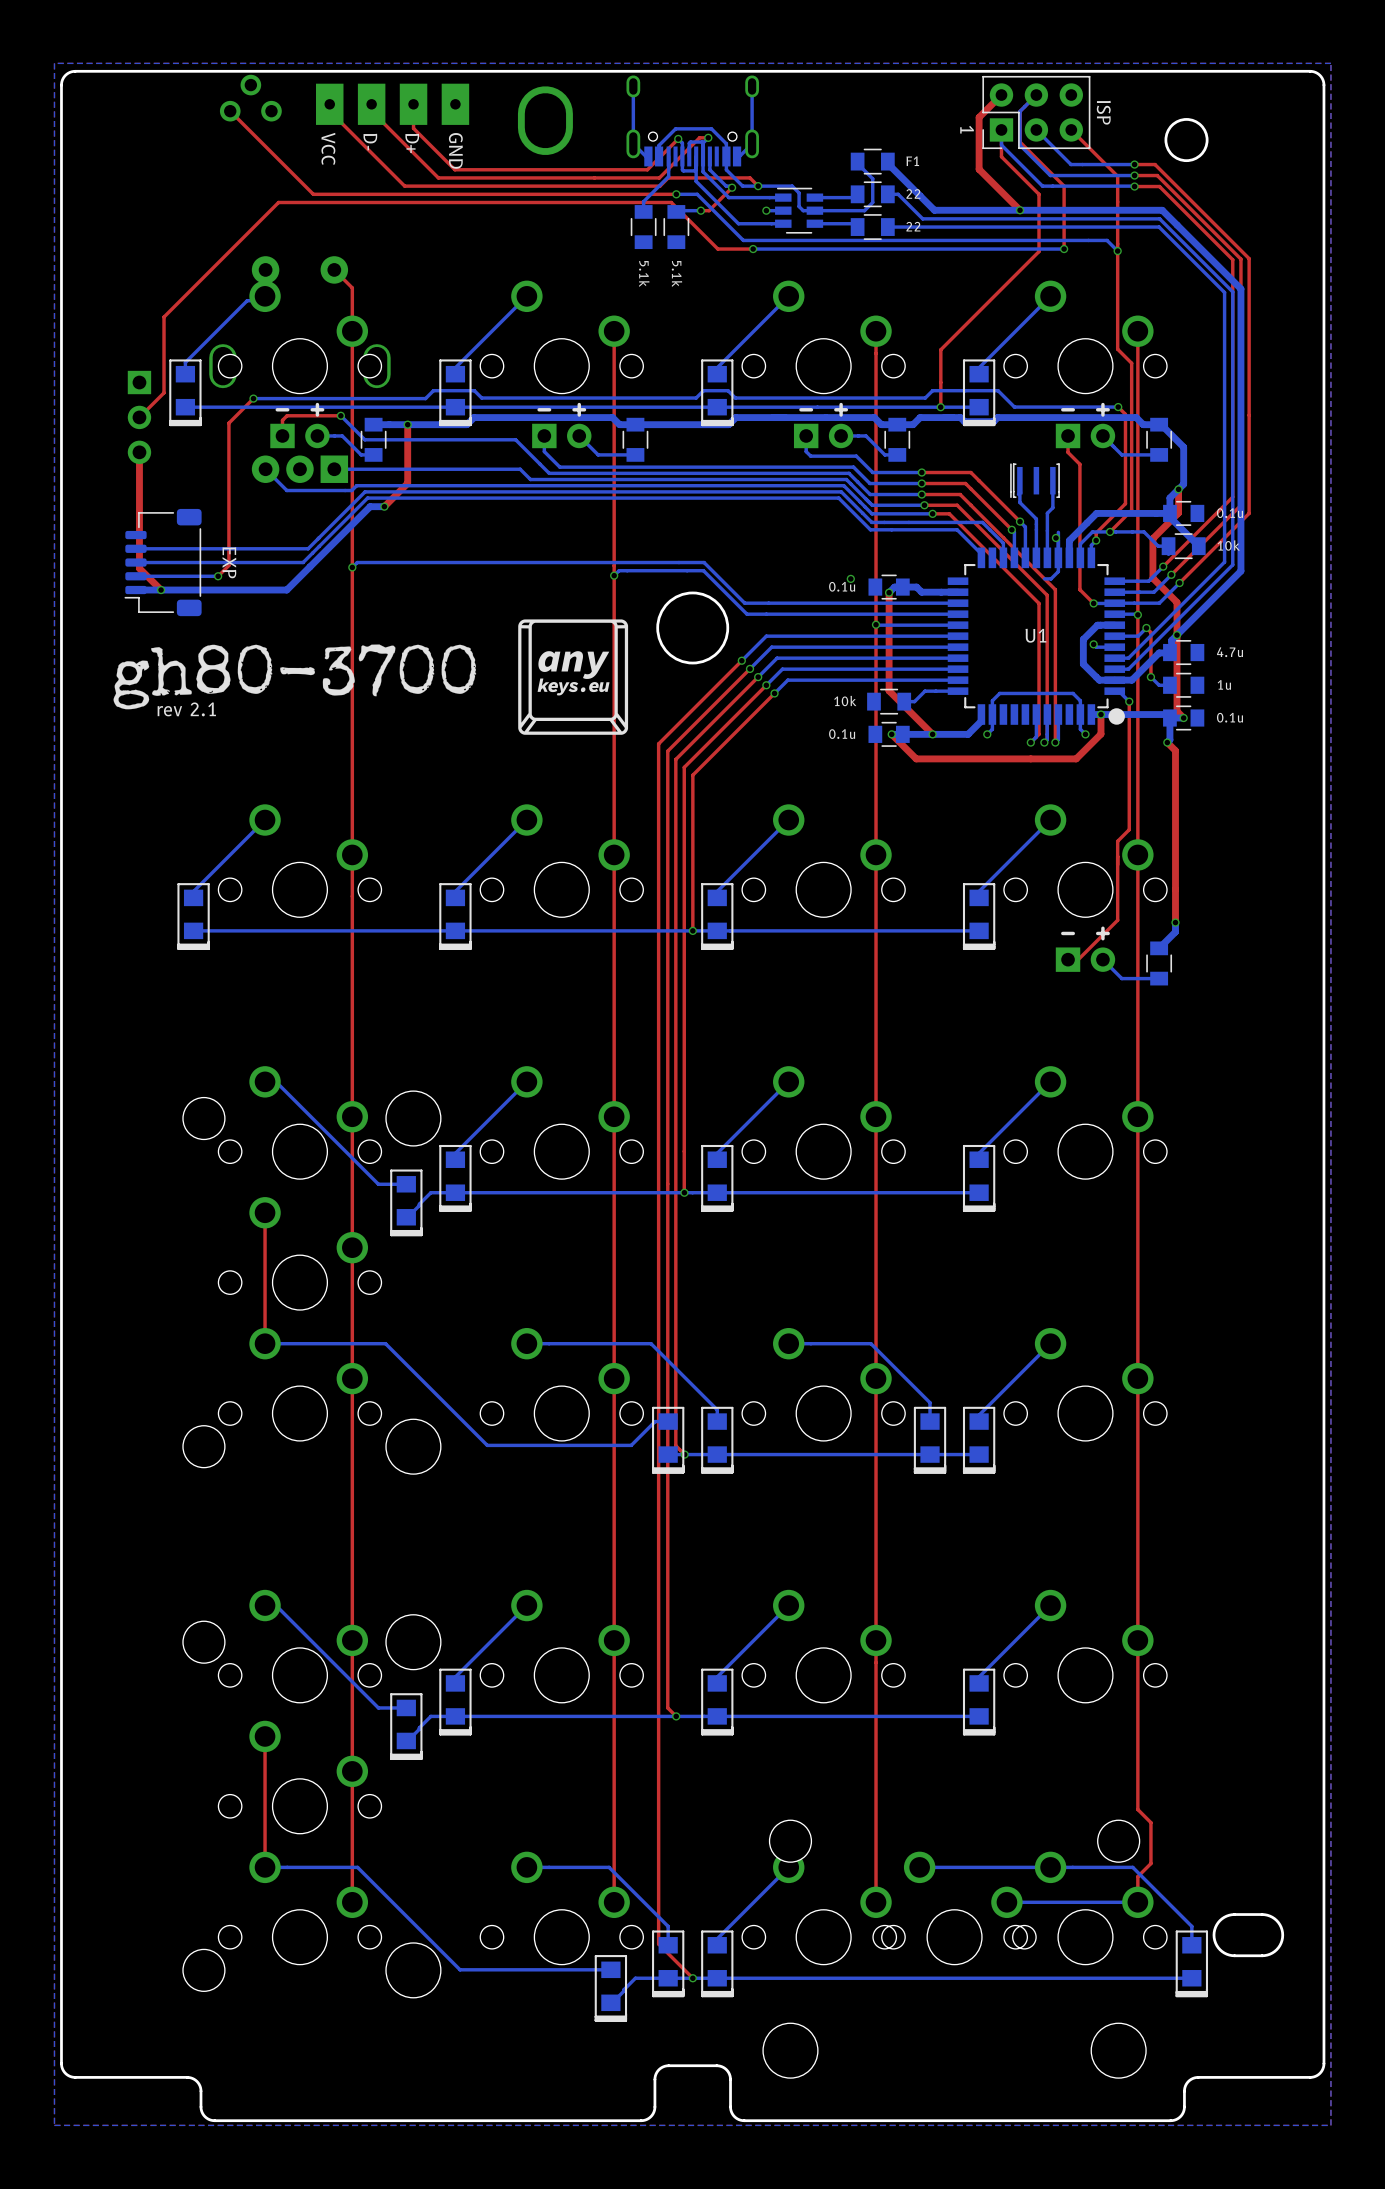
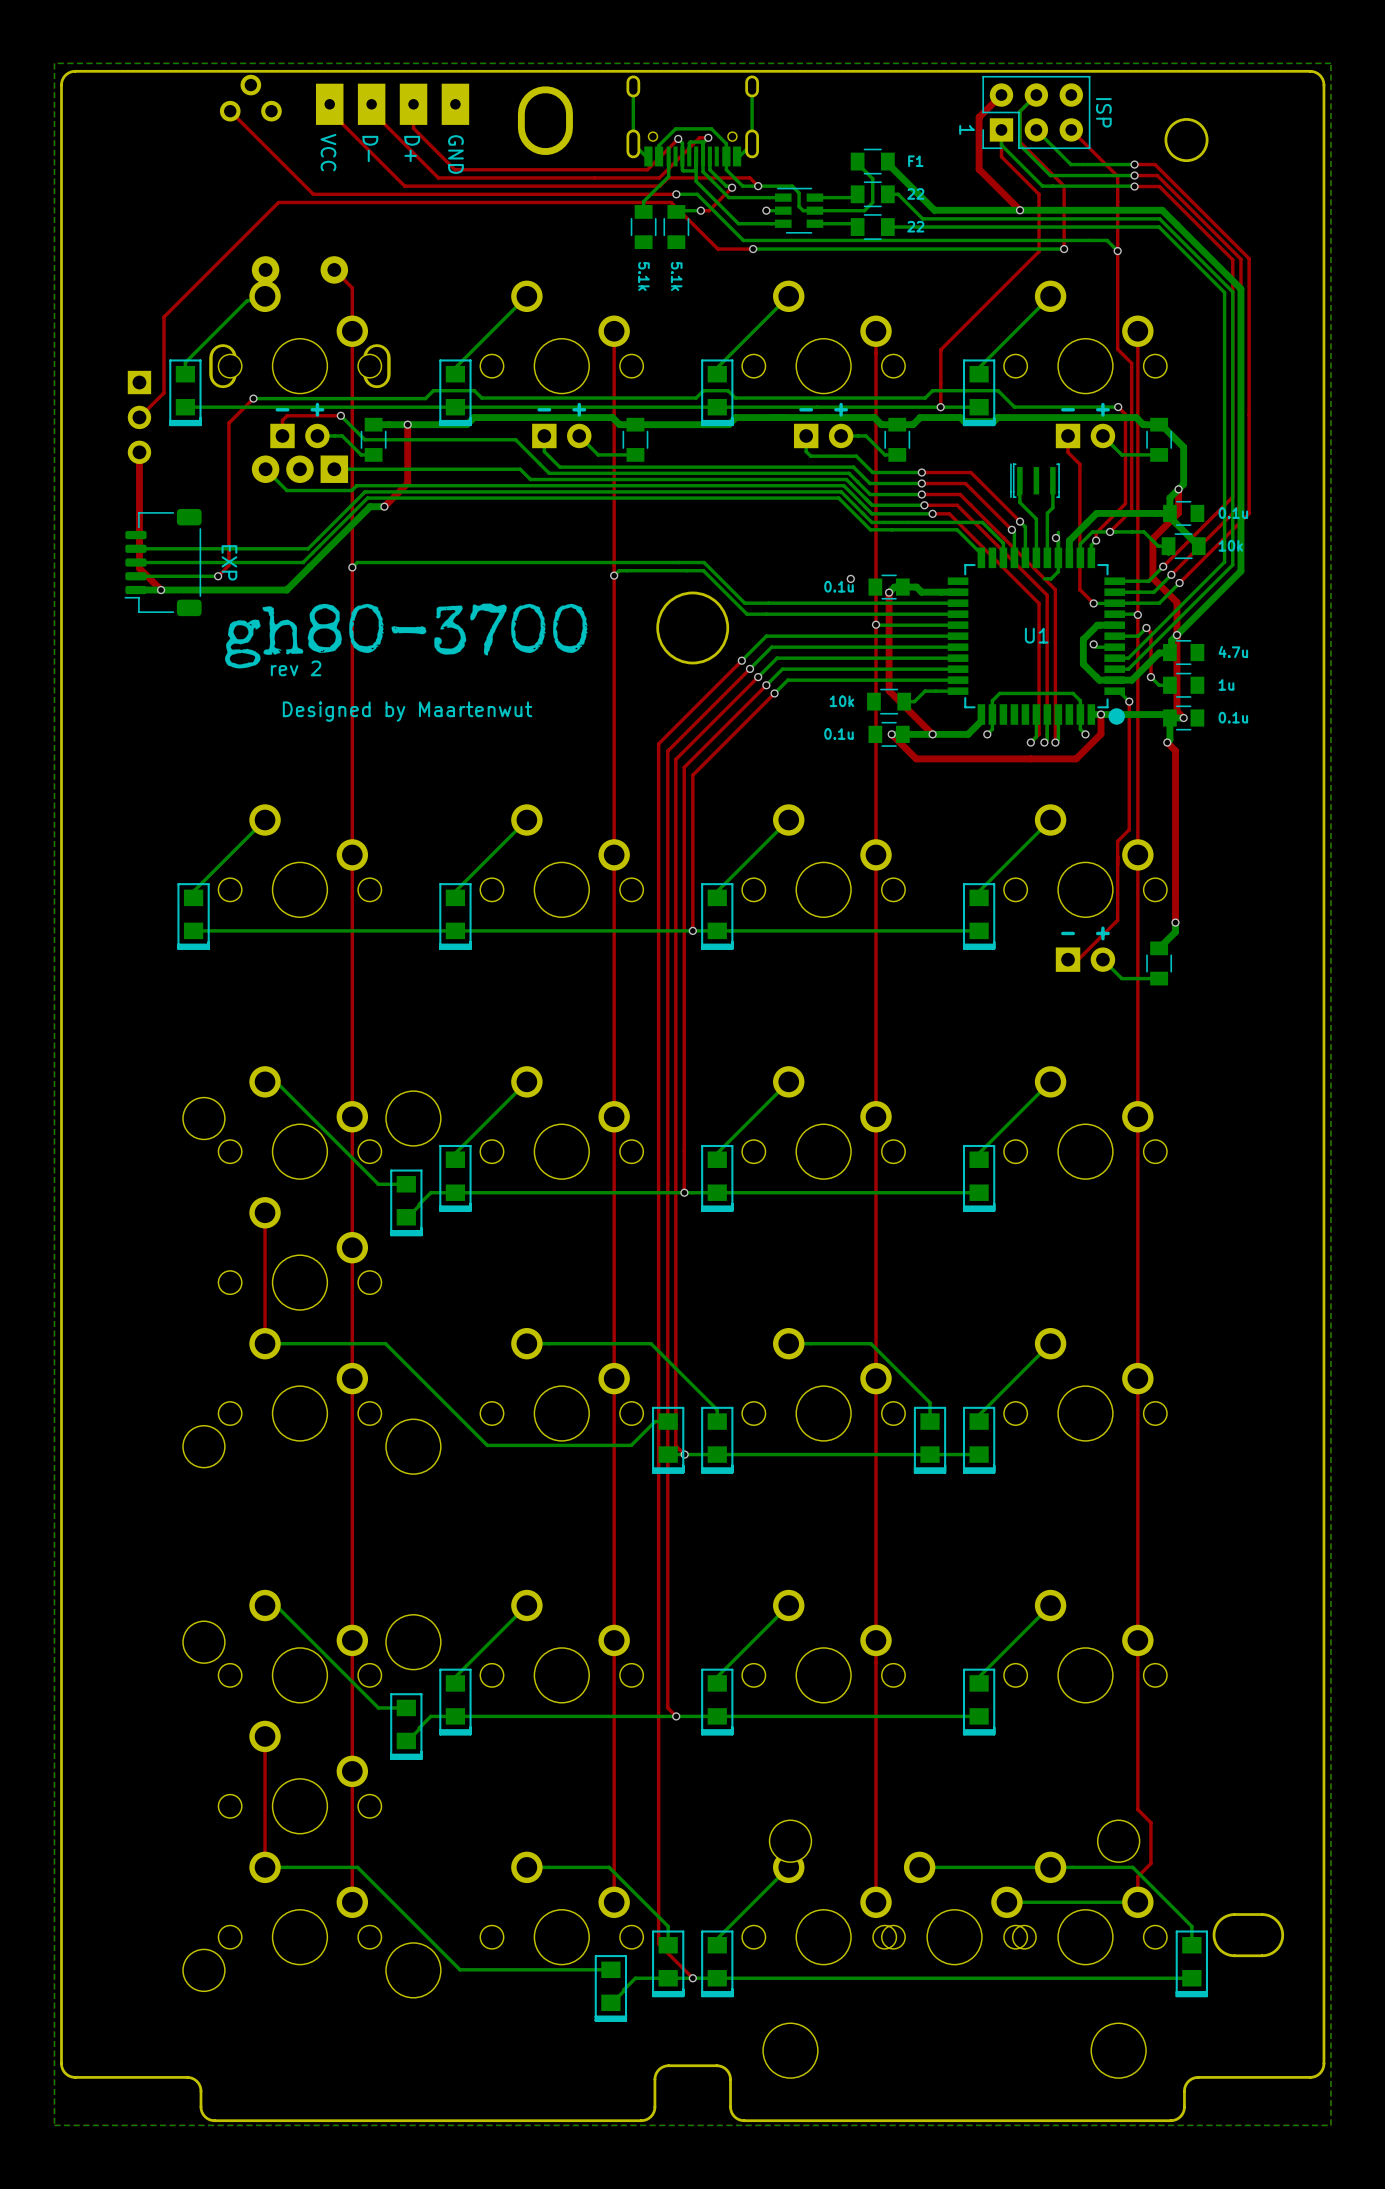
drawing: [518, 619, 629, 735] -> none
text: none -> rev 2 (296, 668)
drawing position: (294, 676) -> (406, 635)
text: rev 2.1 (186, 709) -> none
text: none -> Designed by Maartenwut (407, 711)

